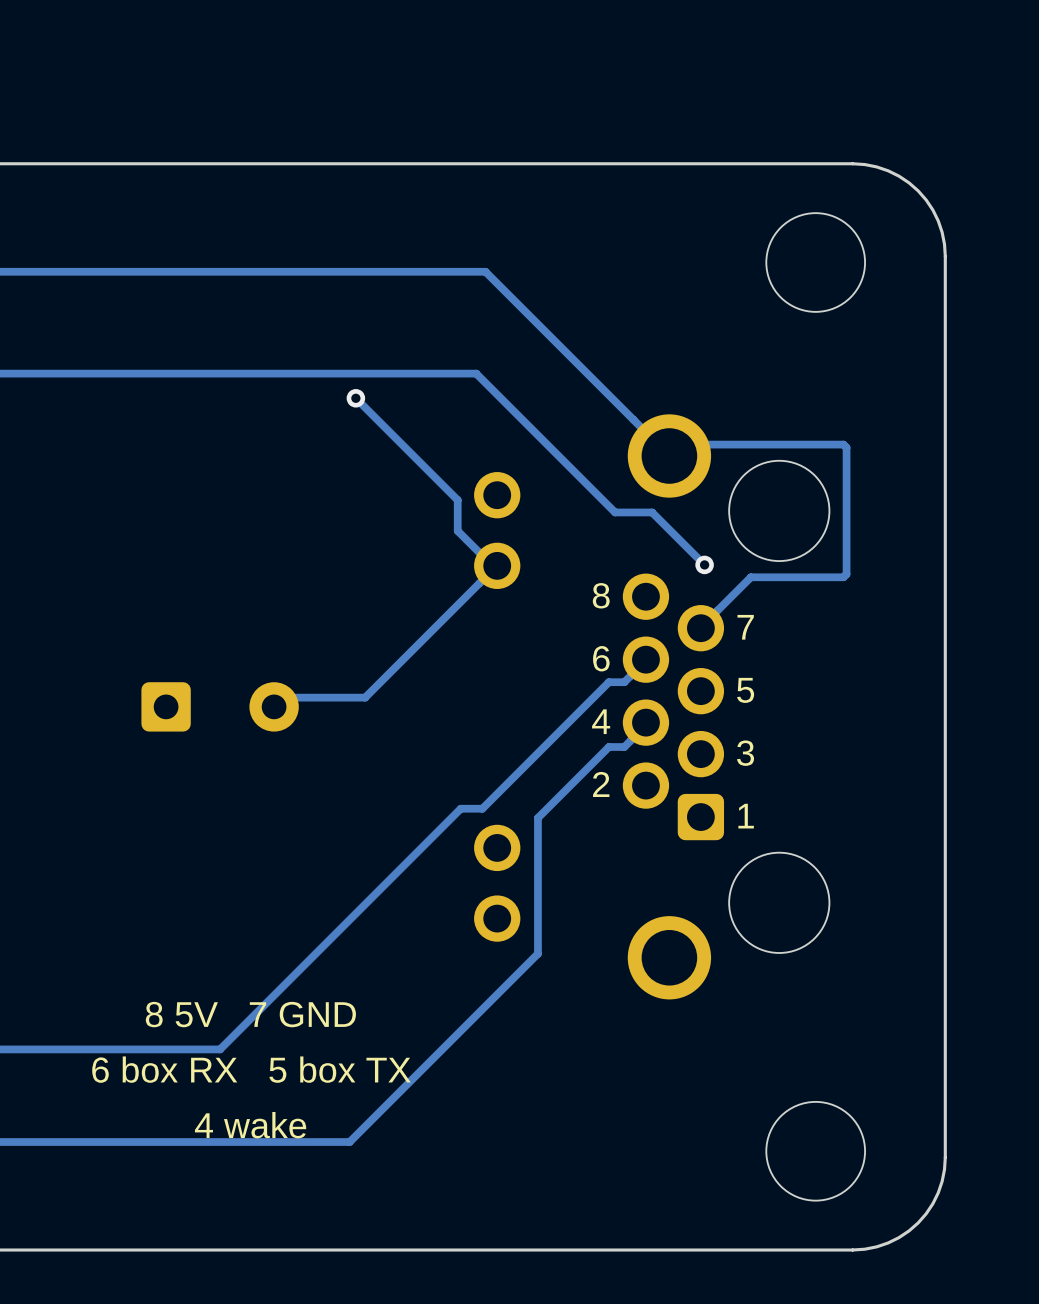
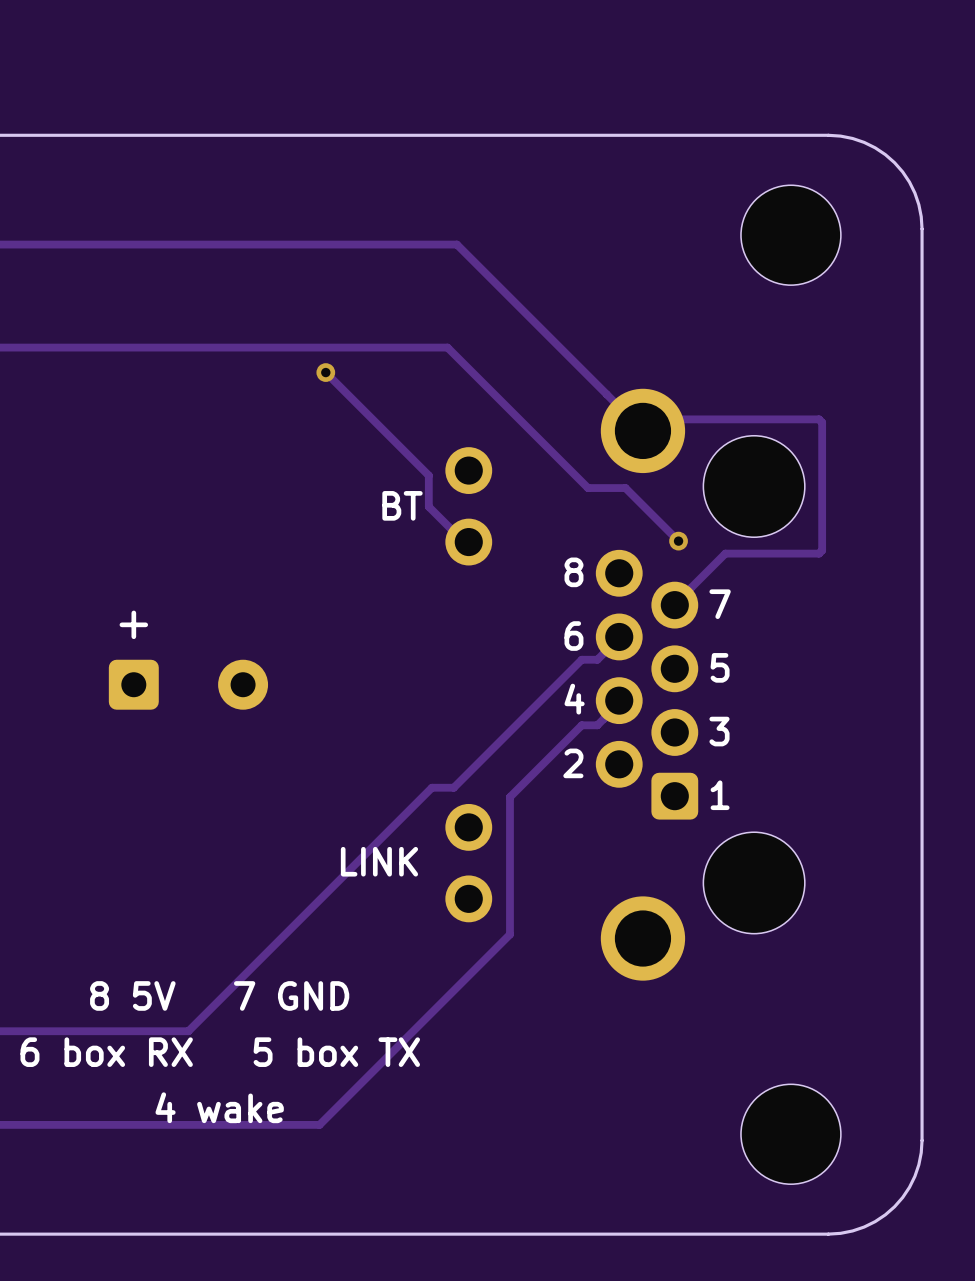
text: none -> BT (402, 505)
track: (497, 565) (365, 697) (294, 697) (274, 706) -> none
text: none -> + (133, 624)
text: none -> LINK (379, 861)

